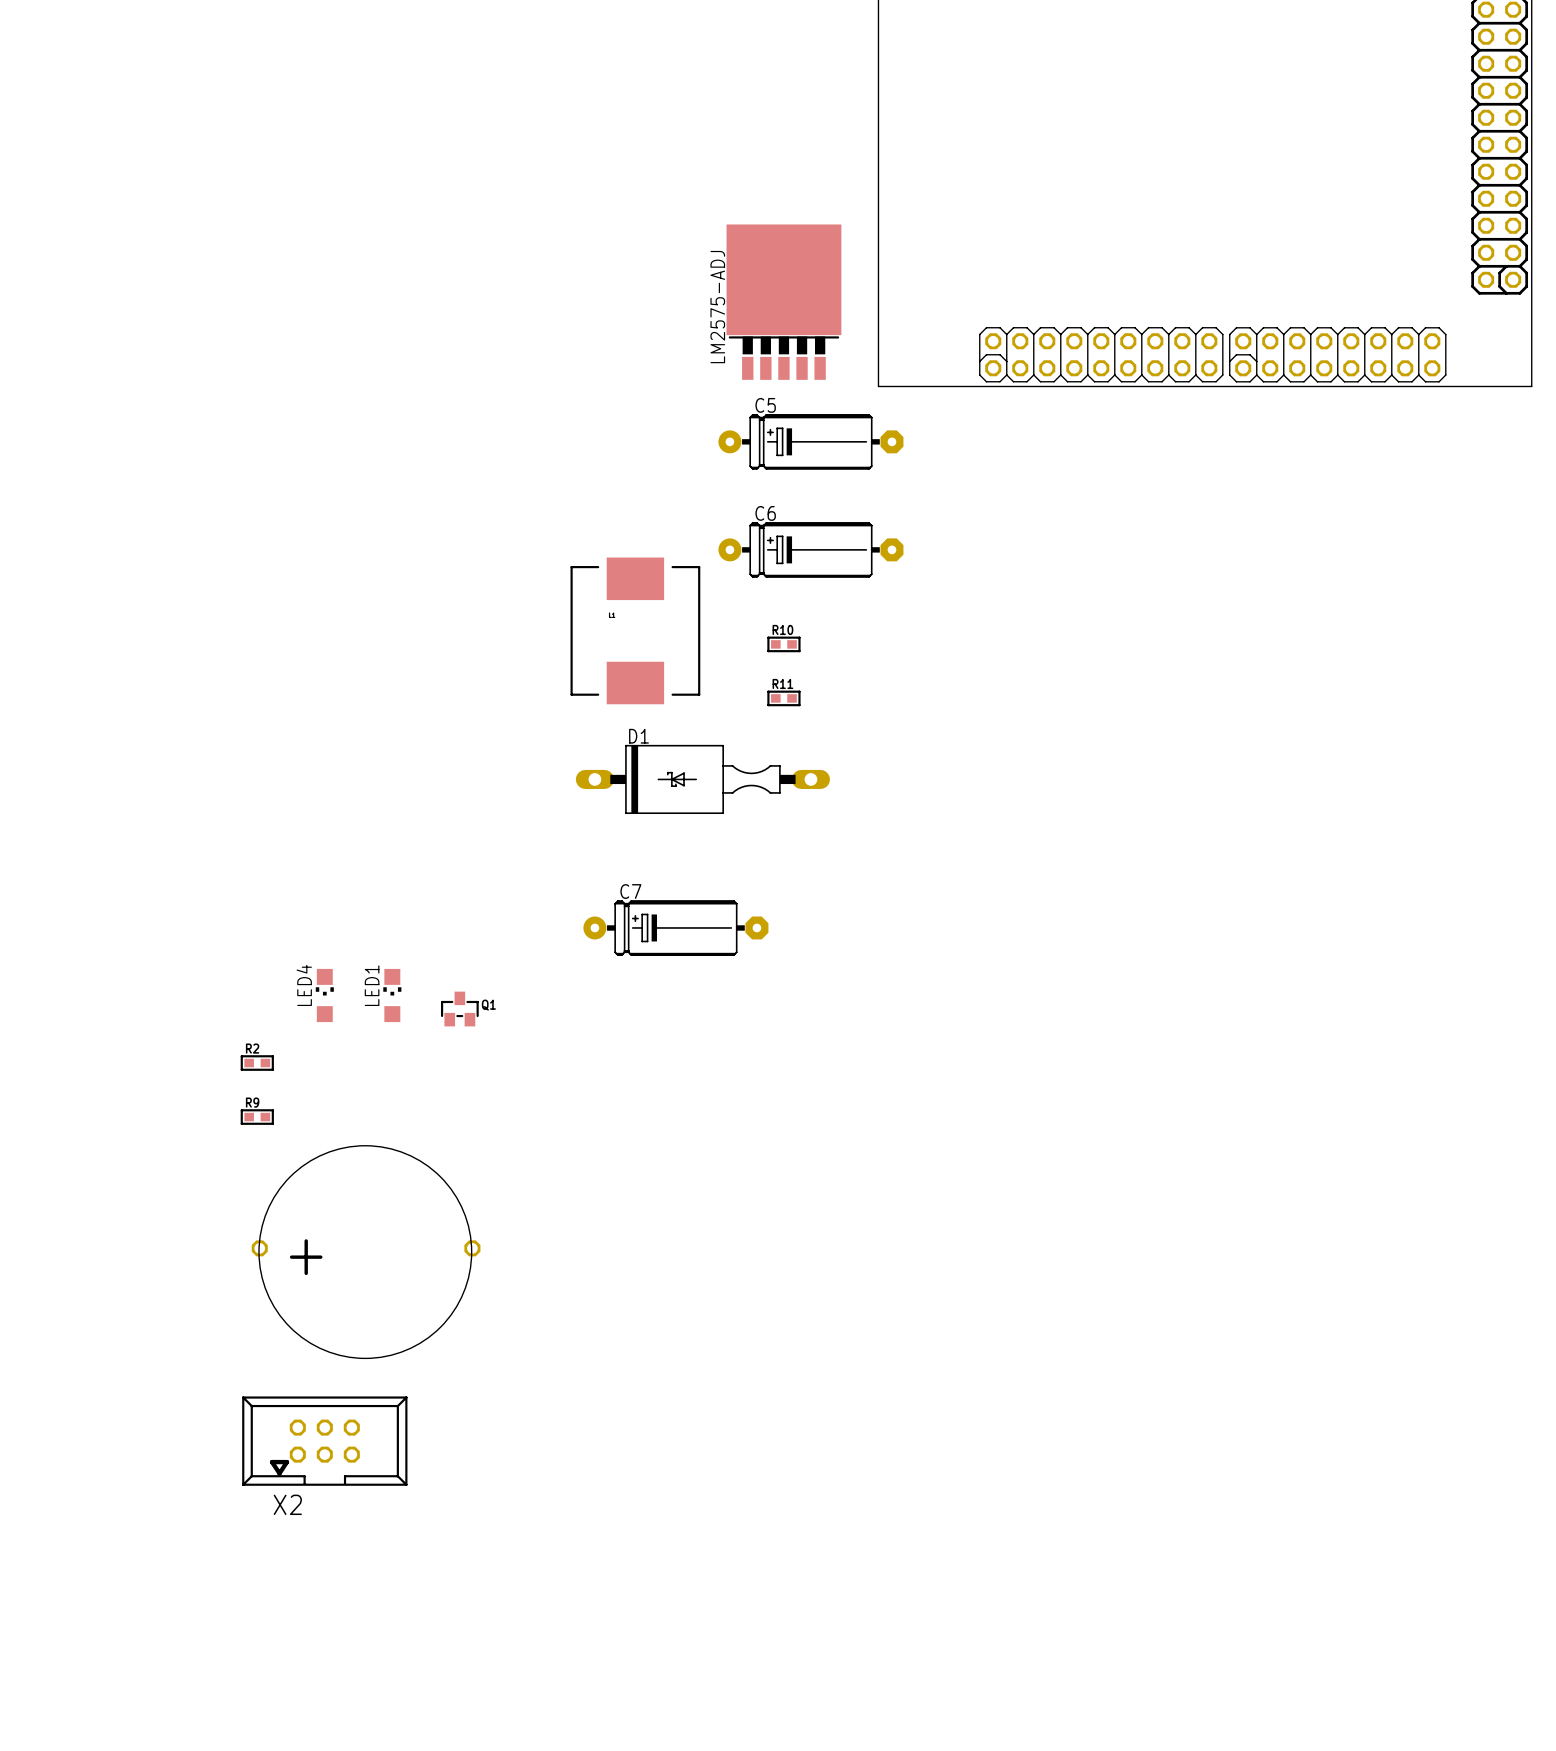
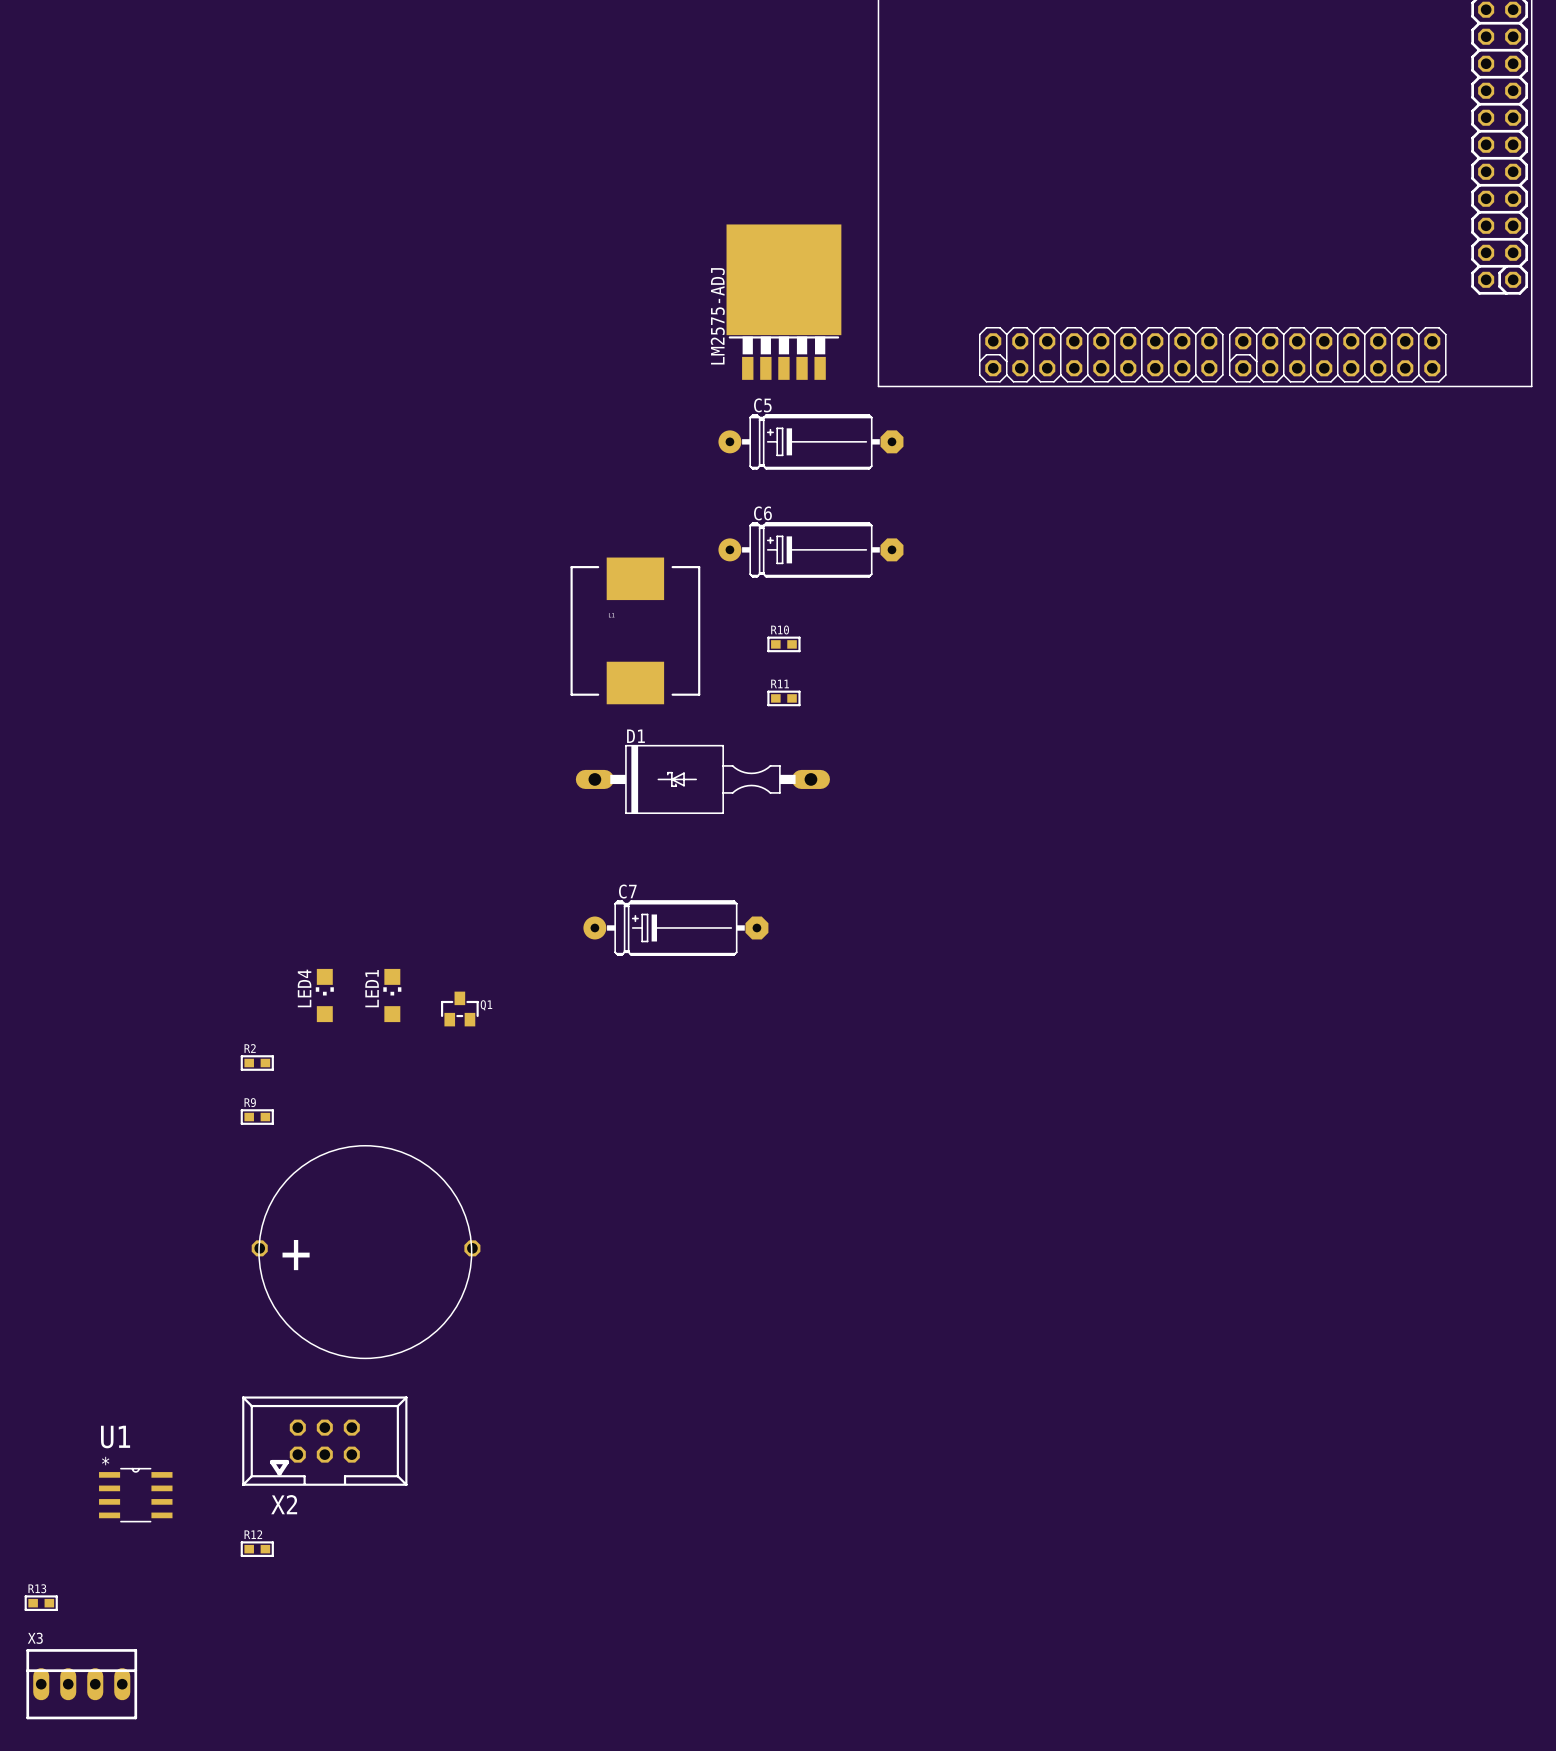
U1: none -> (135, 1495)
R12: none -> (257, 1549)
R13: none -> (41, 1603)
X3: none -> (81, 1684)

